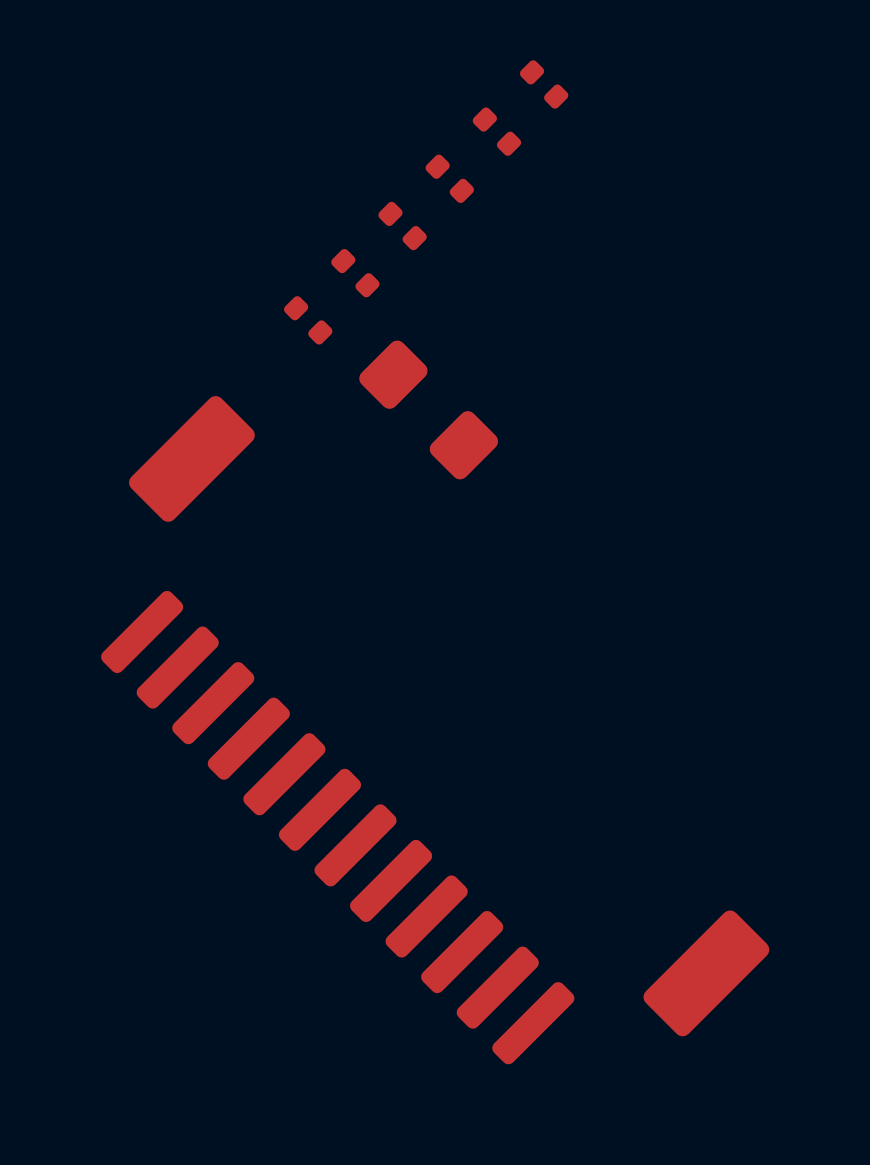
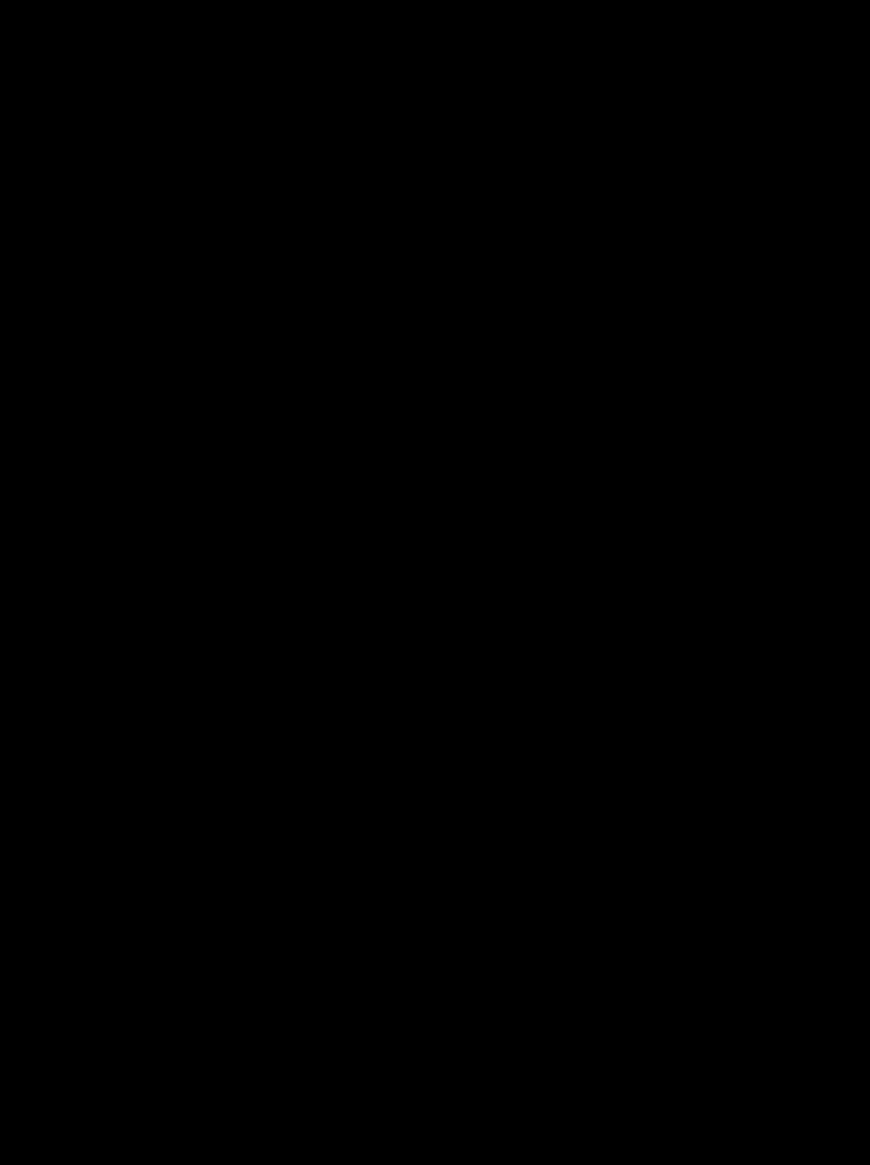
part: (544, 84) -> none
part: (496, 131) -> none
part: (449, 178) -> none
part: (402, 226) -> none
part: (355, 273) -> none
part: (308, 320) -> none
part: (428, 409) -> none
part: (435, 730) -> none

